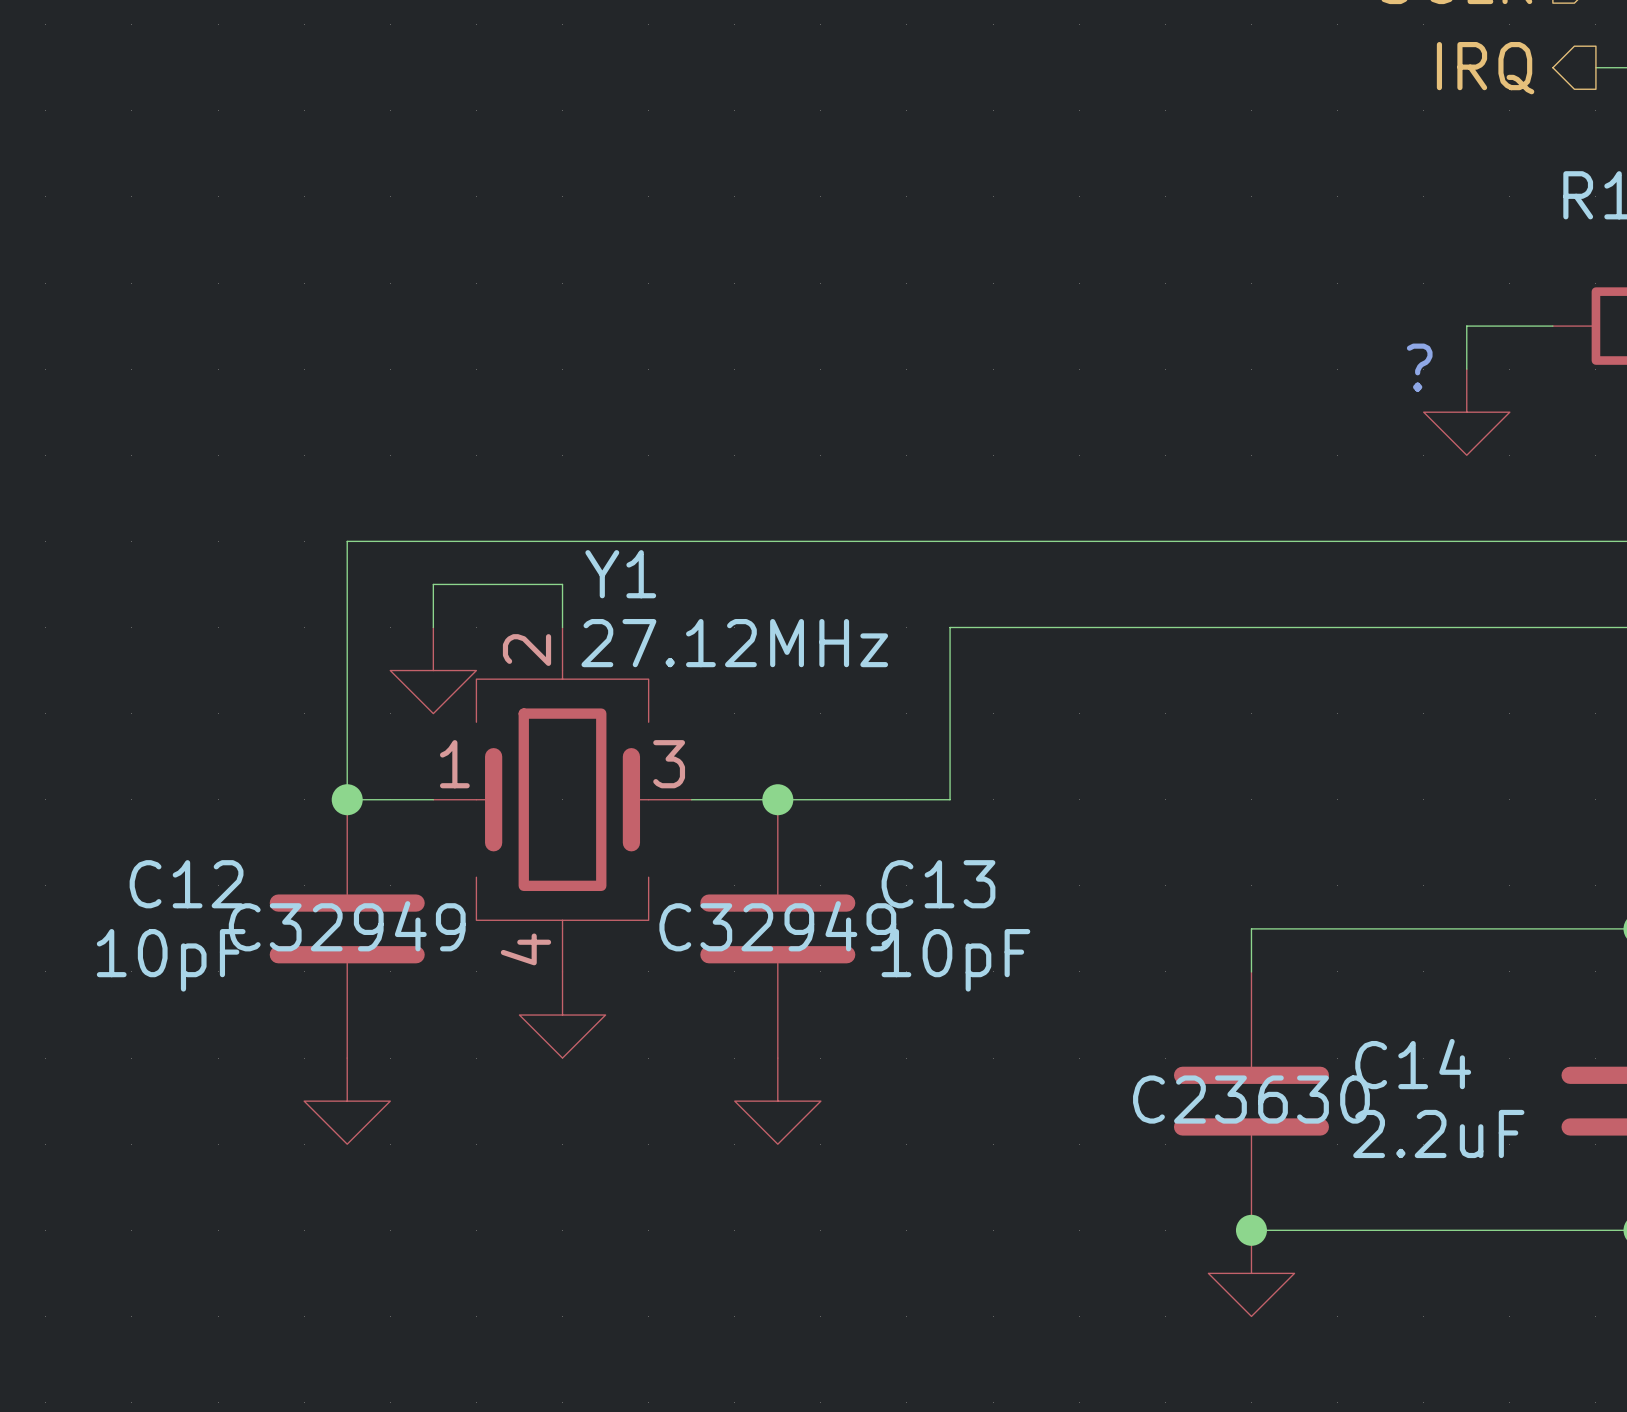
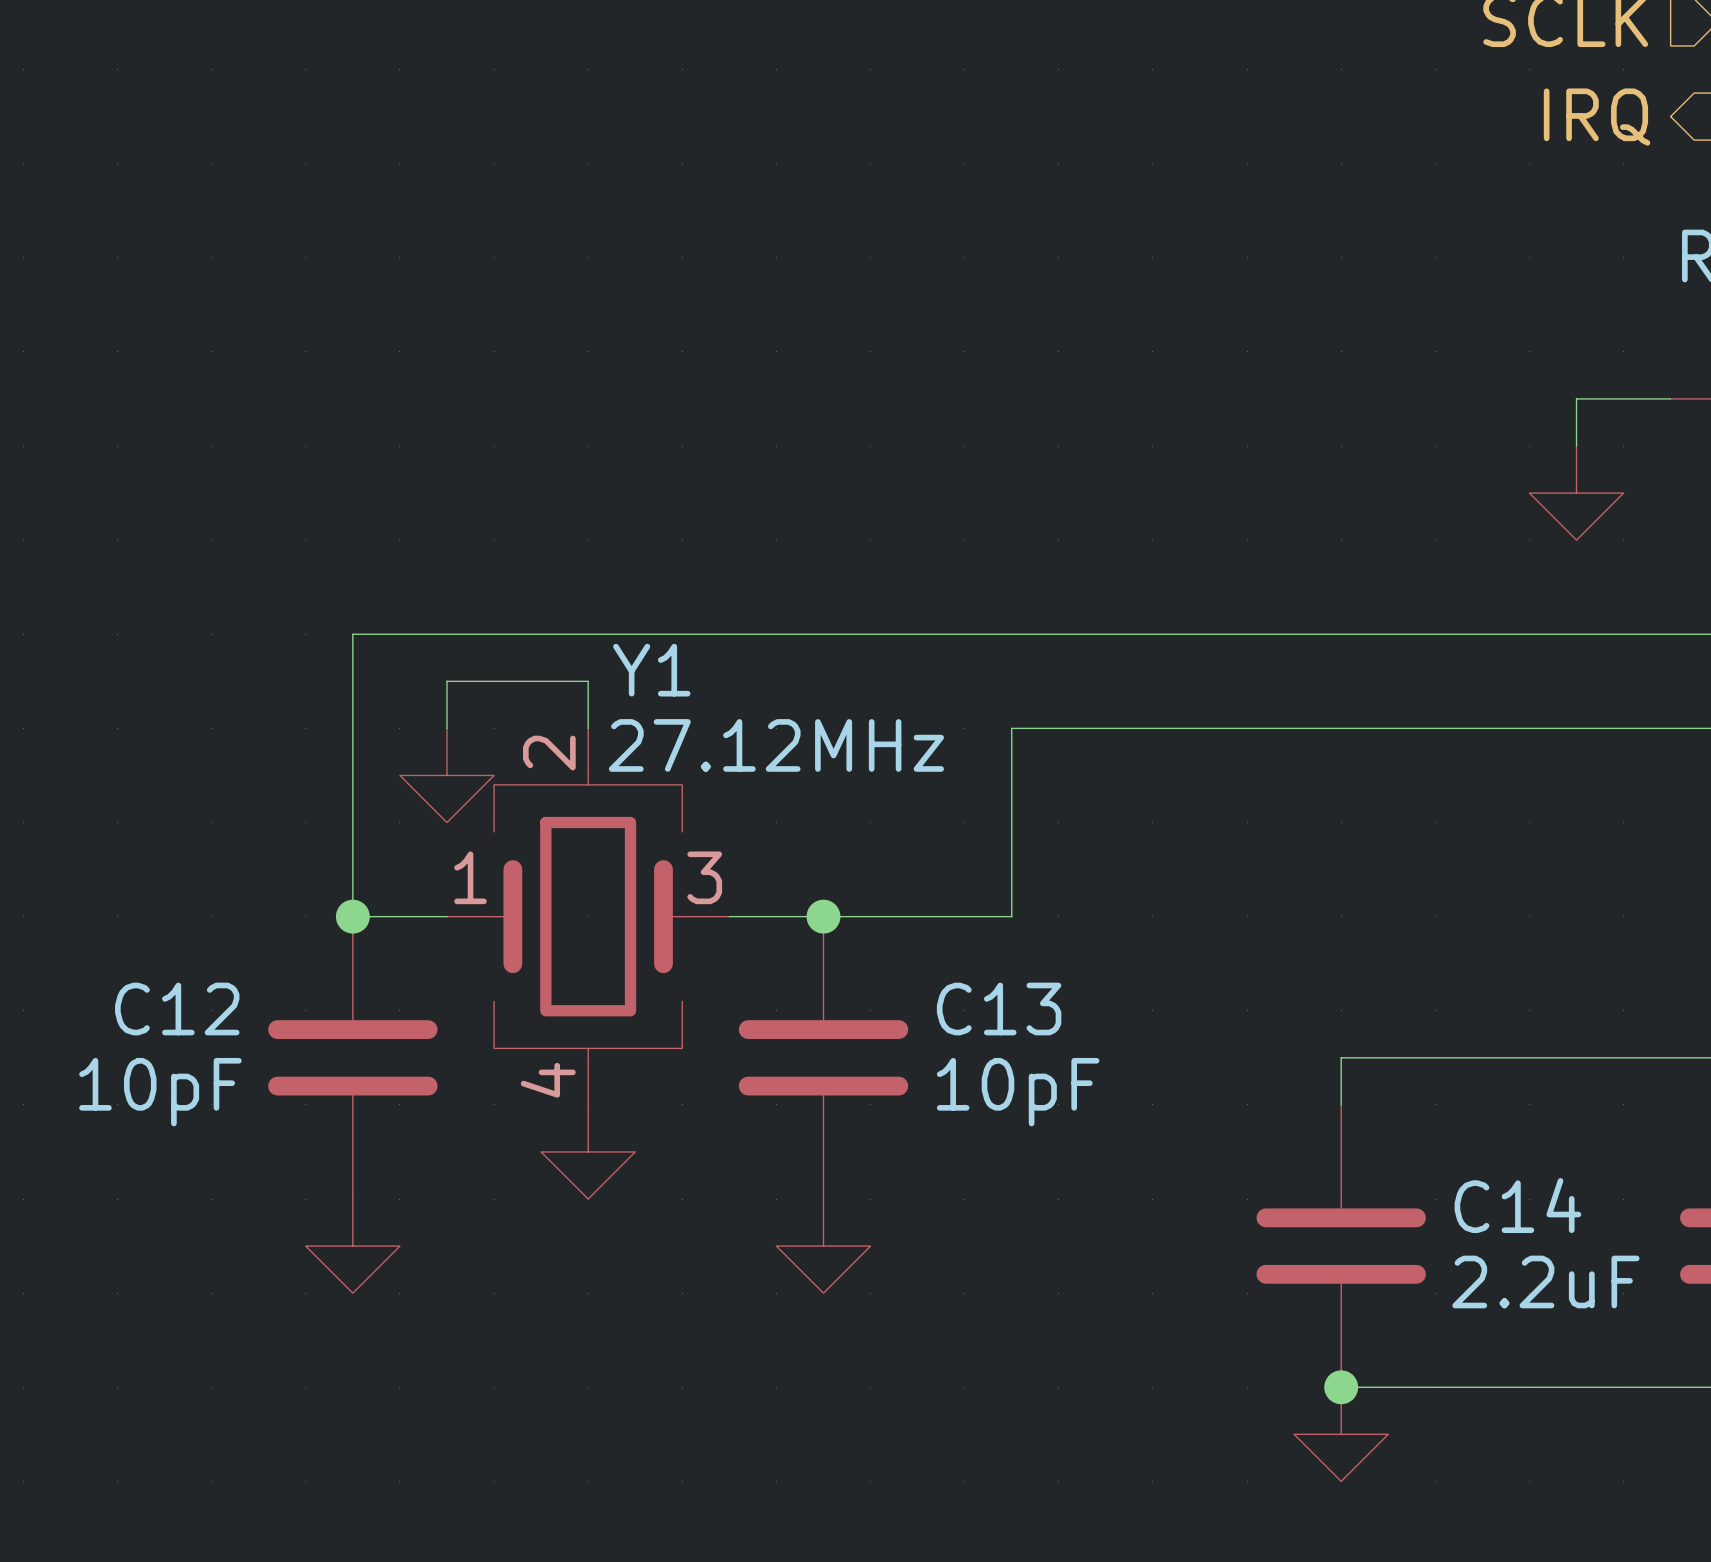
text: ? (1419, 367) -> none
C12 text: C32949 (347, 926) -> none
C13 text: C32949 (777, 926) -> none
C14 text: C23630 (1251, 1099) -> none

